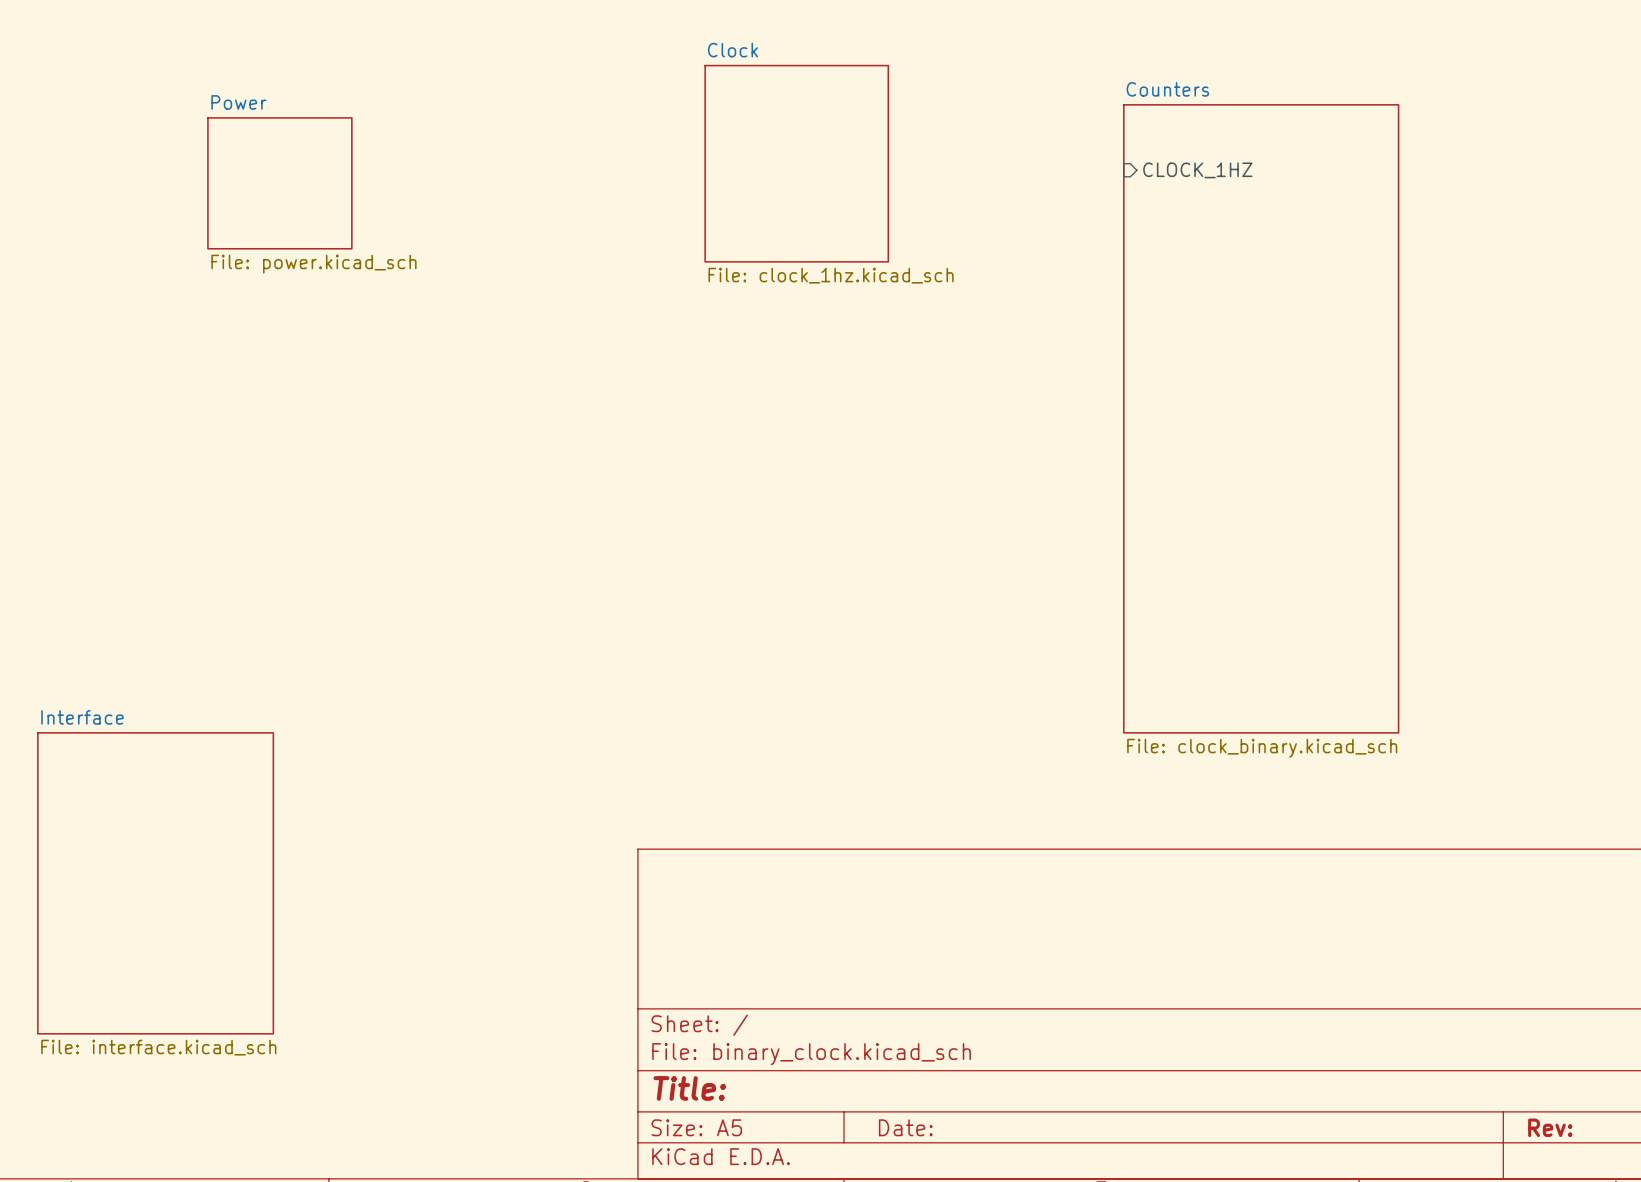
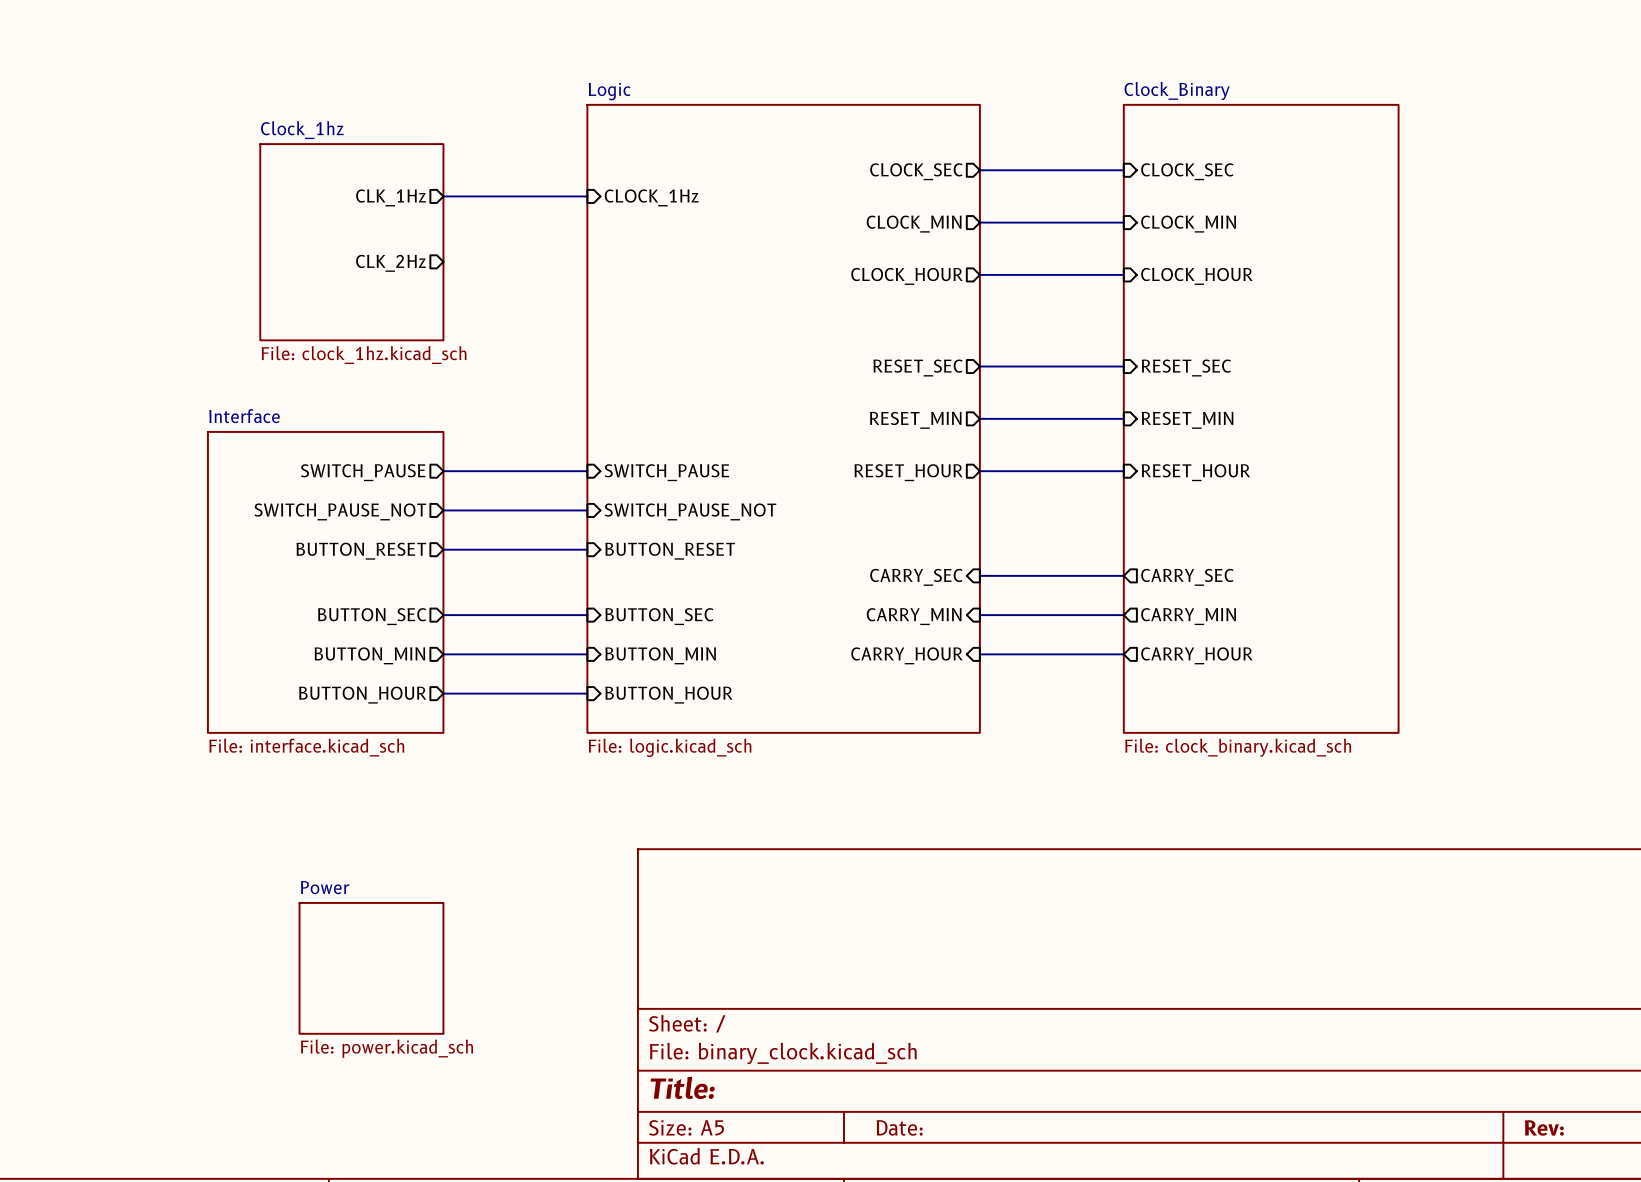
sheet Counters name: Counters (1167, 89) -> Clock_Binary (1177, 91)
sheet Clock: File: clock_1hz.kicad_sch (796, 163) -> none
sheet pin: none -> CLOCK_SEC (916, 171)
wire: none -> (979, 170) (1123, 170)
sheet pin: CLOCK_1HZ (1197, 170) -> CLOCK_SEC (1187, 171)
sheet Power: File: power.kicad_sch (279, 183) -> none
sheet pin: none -> CLK_1Hz (391, 197)
wire: none -> (443, 196) (587, 196)
sheet pin: none -> CLOCK_1Hz (651, 197)
sheet pin: none -> CLOCK_MIN (914, 224)
wire: none -> (979, 222) (1123, 222)
sheet pin: none -> CLOCK_MIN (1188, 224)
sheet Clock_1hz: none -> File: clock_1hz.kicad_sch (351, 242)
sheet pin: none -> CLK_2Hz (391, 263)
wire: none -> (979, 274) (1123, 274)
sheet pin: none -> CLOCK_HOUR (906, 276)
sheet pin: none -> CLOCK_HOUR (1196, 276)
sheet pin: none -> RESET_SEC (917, 368)
wire: none -> (979, 366) (1123, 366)
sheet pin: none -> RESET_SEC (1186, 368)
sheet Logic: none -> File: logic.kicad_sch (783, 418)
sheet pin: none -> RESET_MIN (915, 420)
wire: none -> (979, 418) (1123, 418)
sheet pin: none -> RESET_MIN (1187, 420)
sheet pin: none -> SWITCH_PAUSE (363, 472)
wire: none -> (443, 471) (587, 471)
sheet pin: none -> SWITCH_PAUSE (666, 472)
sheet pin: none -> RESET_HOUR (908, 472)
wire: none -> (979, 471) (1123, 471)
sheet pin: none -> RESET_HOUR (1195, 472)
sheet pin: none -> SWITCH_PAUSE_NOT (340, 511)
wire: none -> (443, 510) (587, 510)
sheet pin: none -> SWITCH_PAUSE_NOT (690, 511)
sheet pin: none -> BUTTON_RESET (361, 551)
wire: none -> (443, 549) (587, 549)
sheet pin: none -> BUTTON_RESET (670, 551)
wire: none -> (979, 575) (1123, 575)
sheet pin: none -> CARRY_SEC (916, 577)
sheet pin: none -> CARRY_SEC (1187, 577)
sheet Interface: none -> File: interface.kicad_sch (325, 582)
sheet pin: none -> BUTTON_SEC (372, 616)
wire: none -> (443, 615) (587, 615)
sheet pin: none -> BUTTON_SEC (659, 616)
sheet pin: none -> CARRY_MIN (914, 616)
wire: none -> (979, 615) (1123, 615)
sheet pin: none -> CARRY_MIN (1188, 616)
sheet pin: none -> BUTTON_MIN (369, 655)
wire: none -> (443, 654) (587, 654)
sheet pin: none -> BUTTON_MIN (660, 655)
sheet pin: none -> CARRY_HOUR (906, 655)
wire: none -> (979, 654) (1123, 654)
sheet pin: none -> CARRY_HOUR (1196, 655)
sheet pin: none -> BUTTON_HOUR (362, 695)
wire: none -> (443, 693) (587, 693)
sheet pin: none -> BUTTON_HOUR (668, 695)
sheet Interface: File: interface.kicad_sch (155, 883) -> none
sheet Power: none -> File: power.kicad_sch (371, 968)

